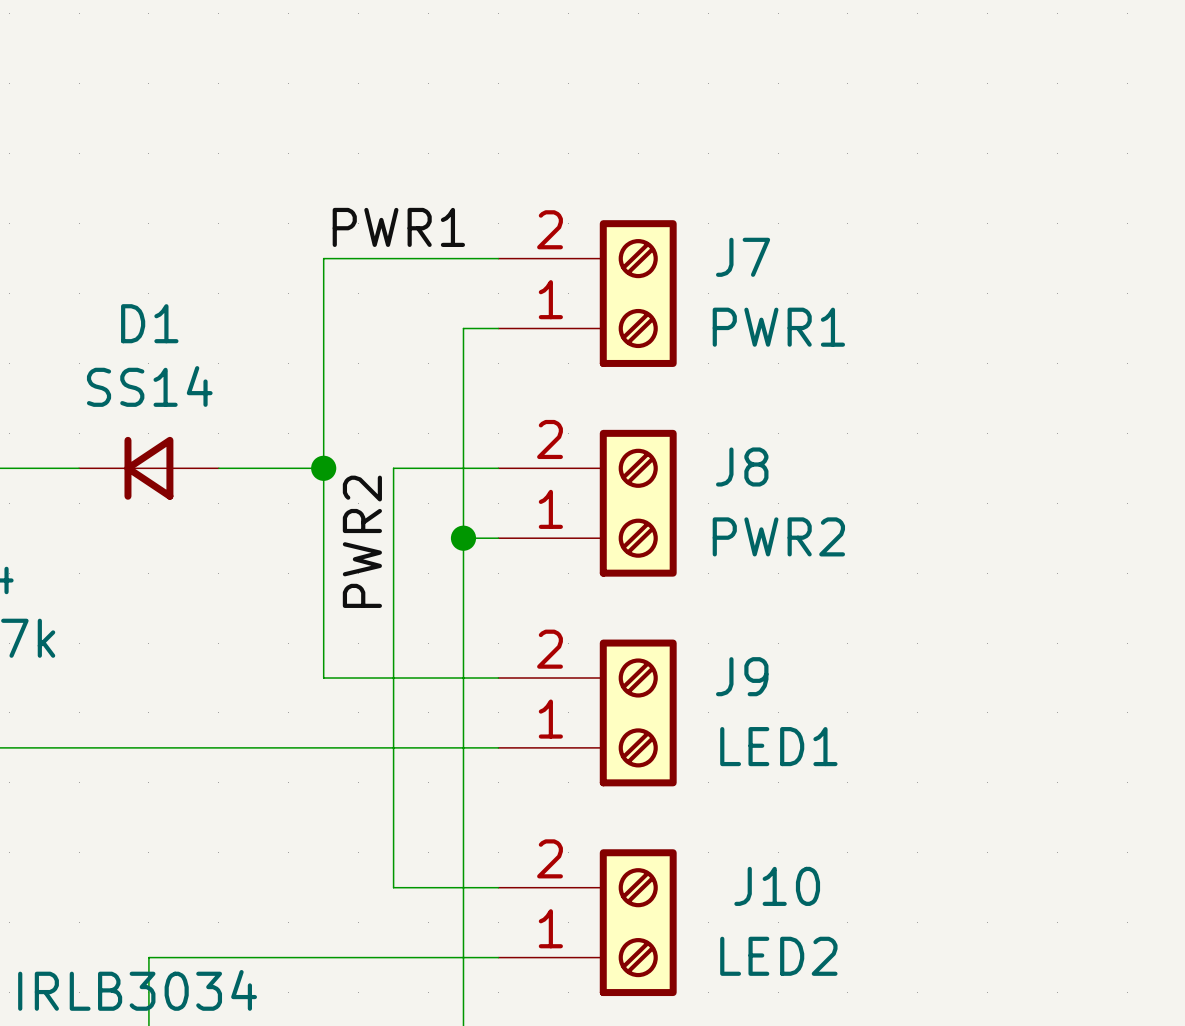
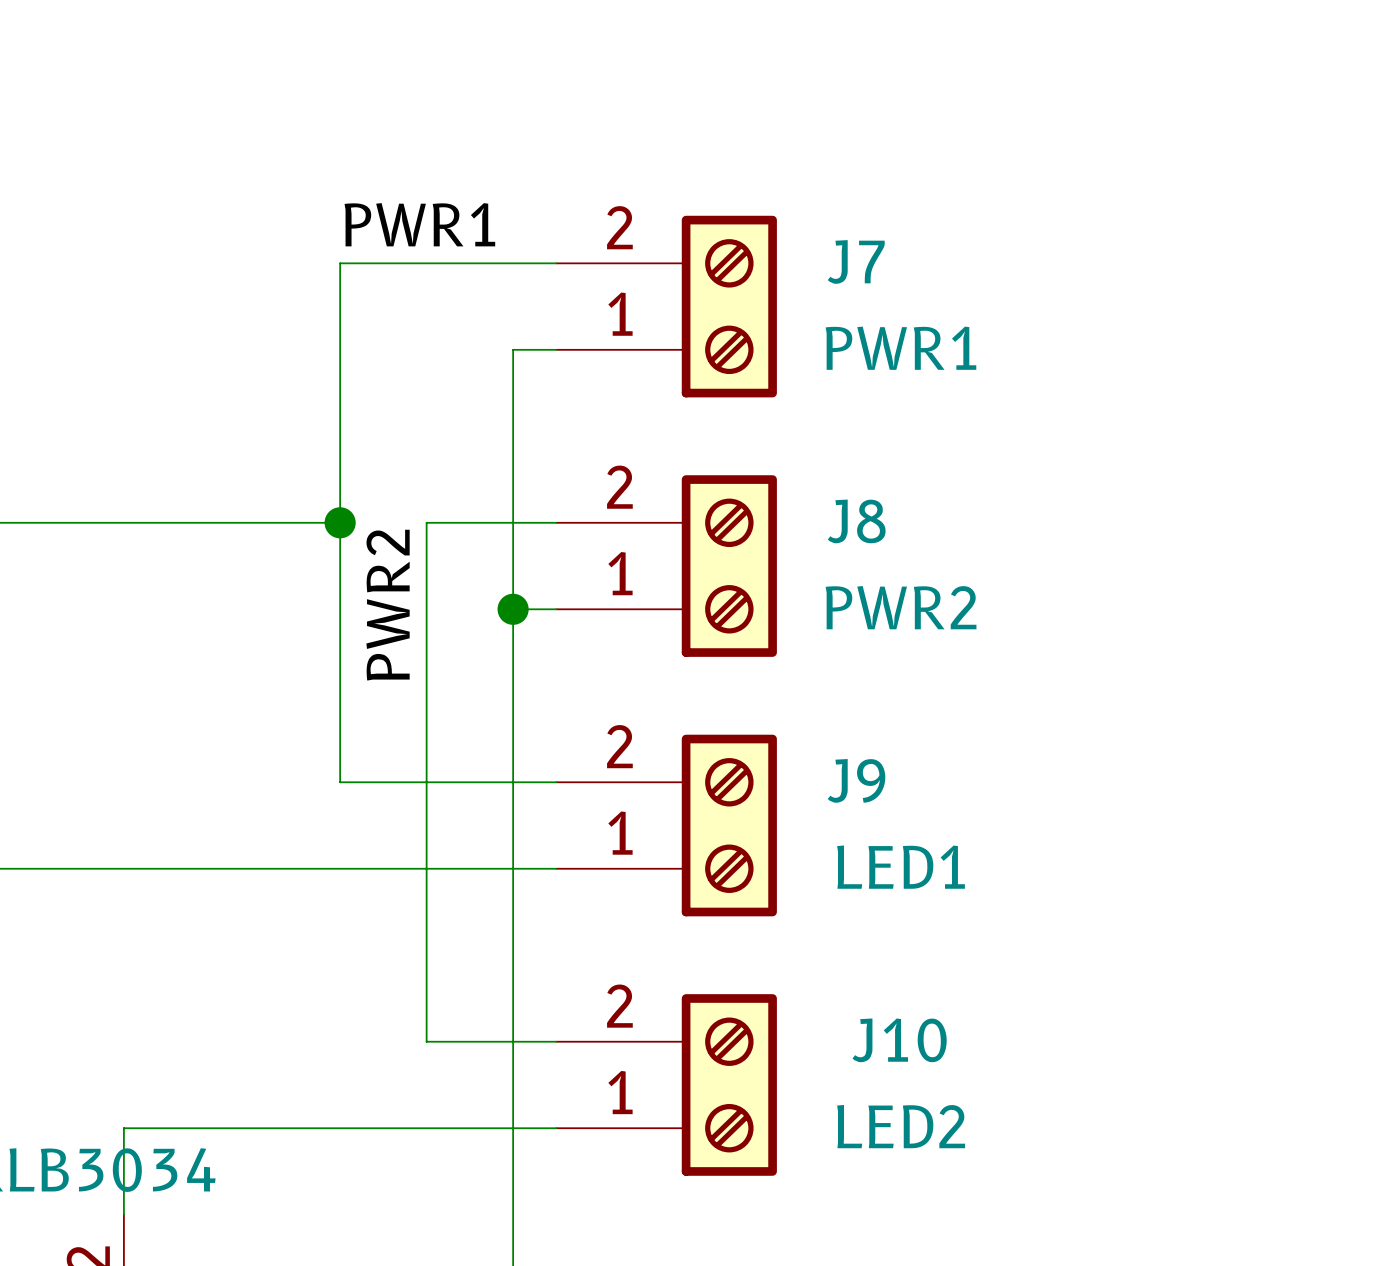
D1: SS14 (148, 468) -> none

